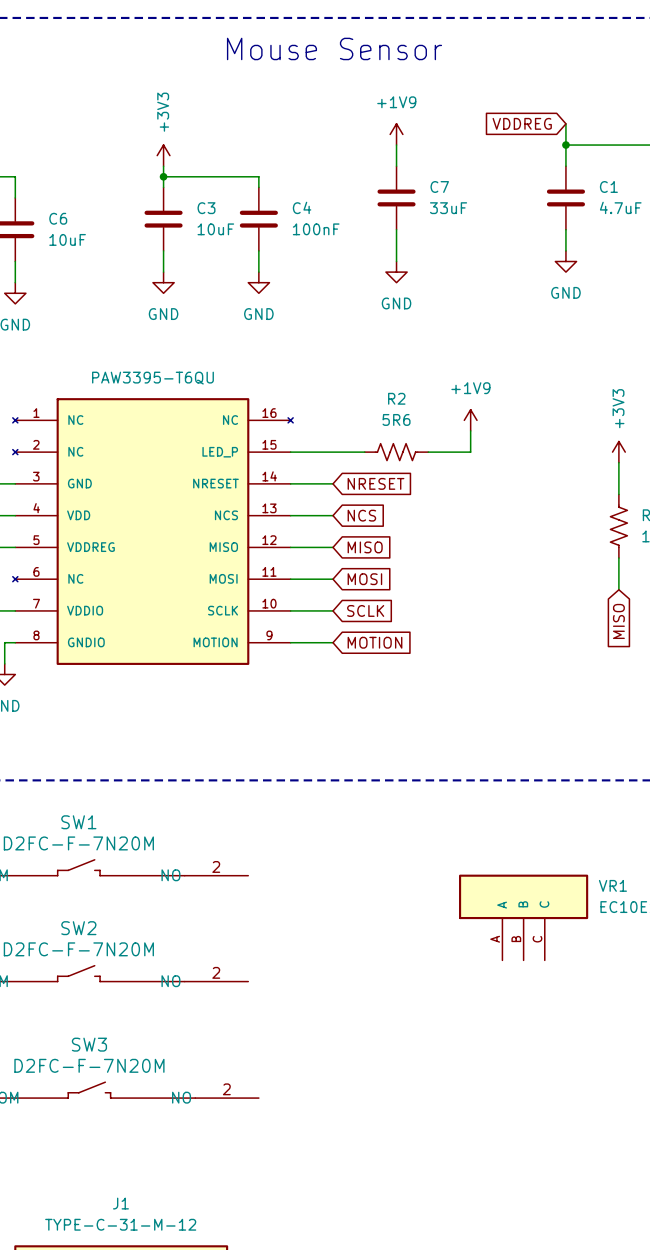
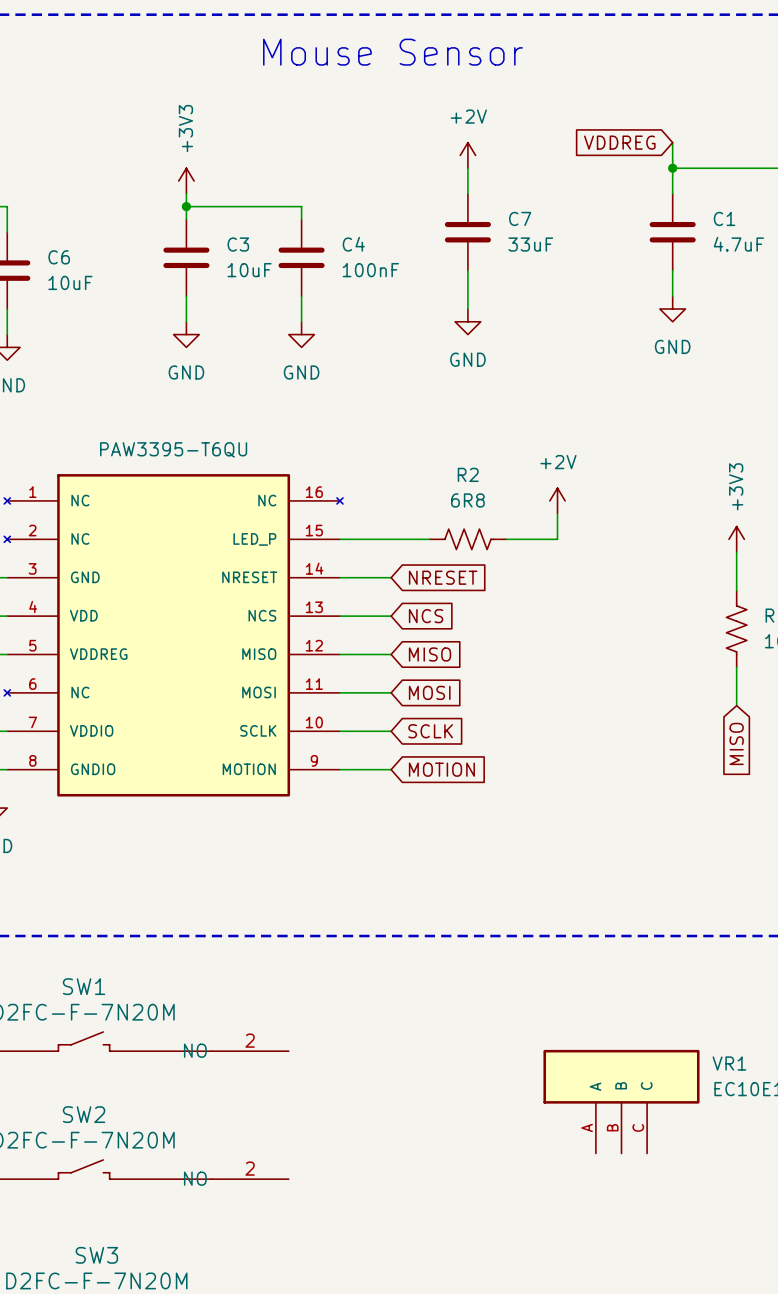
power symbol: +1V9 (396, 134) -> +2V (467, 155)
R2 value: 5R6 (396, 419) -> 6R8 (467, 500)
power symbol: +1V9 (470, 420) -> +2V (557, 500)

